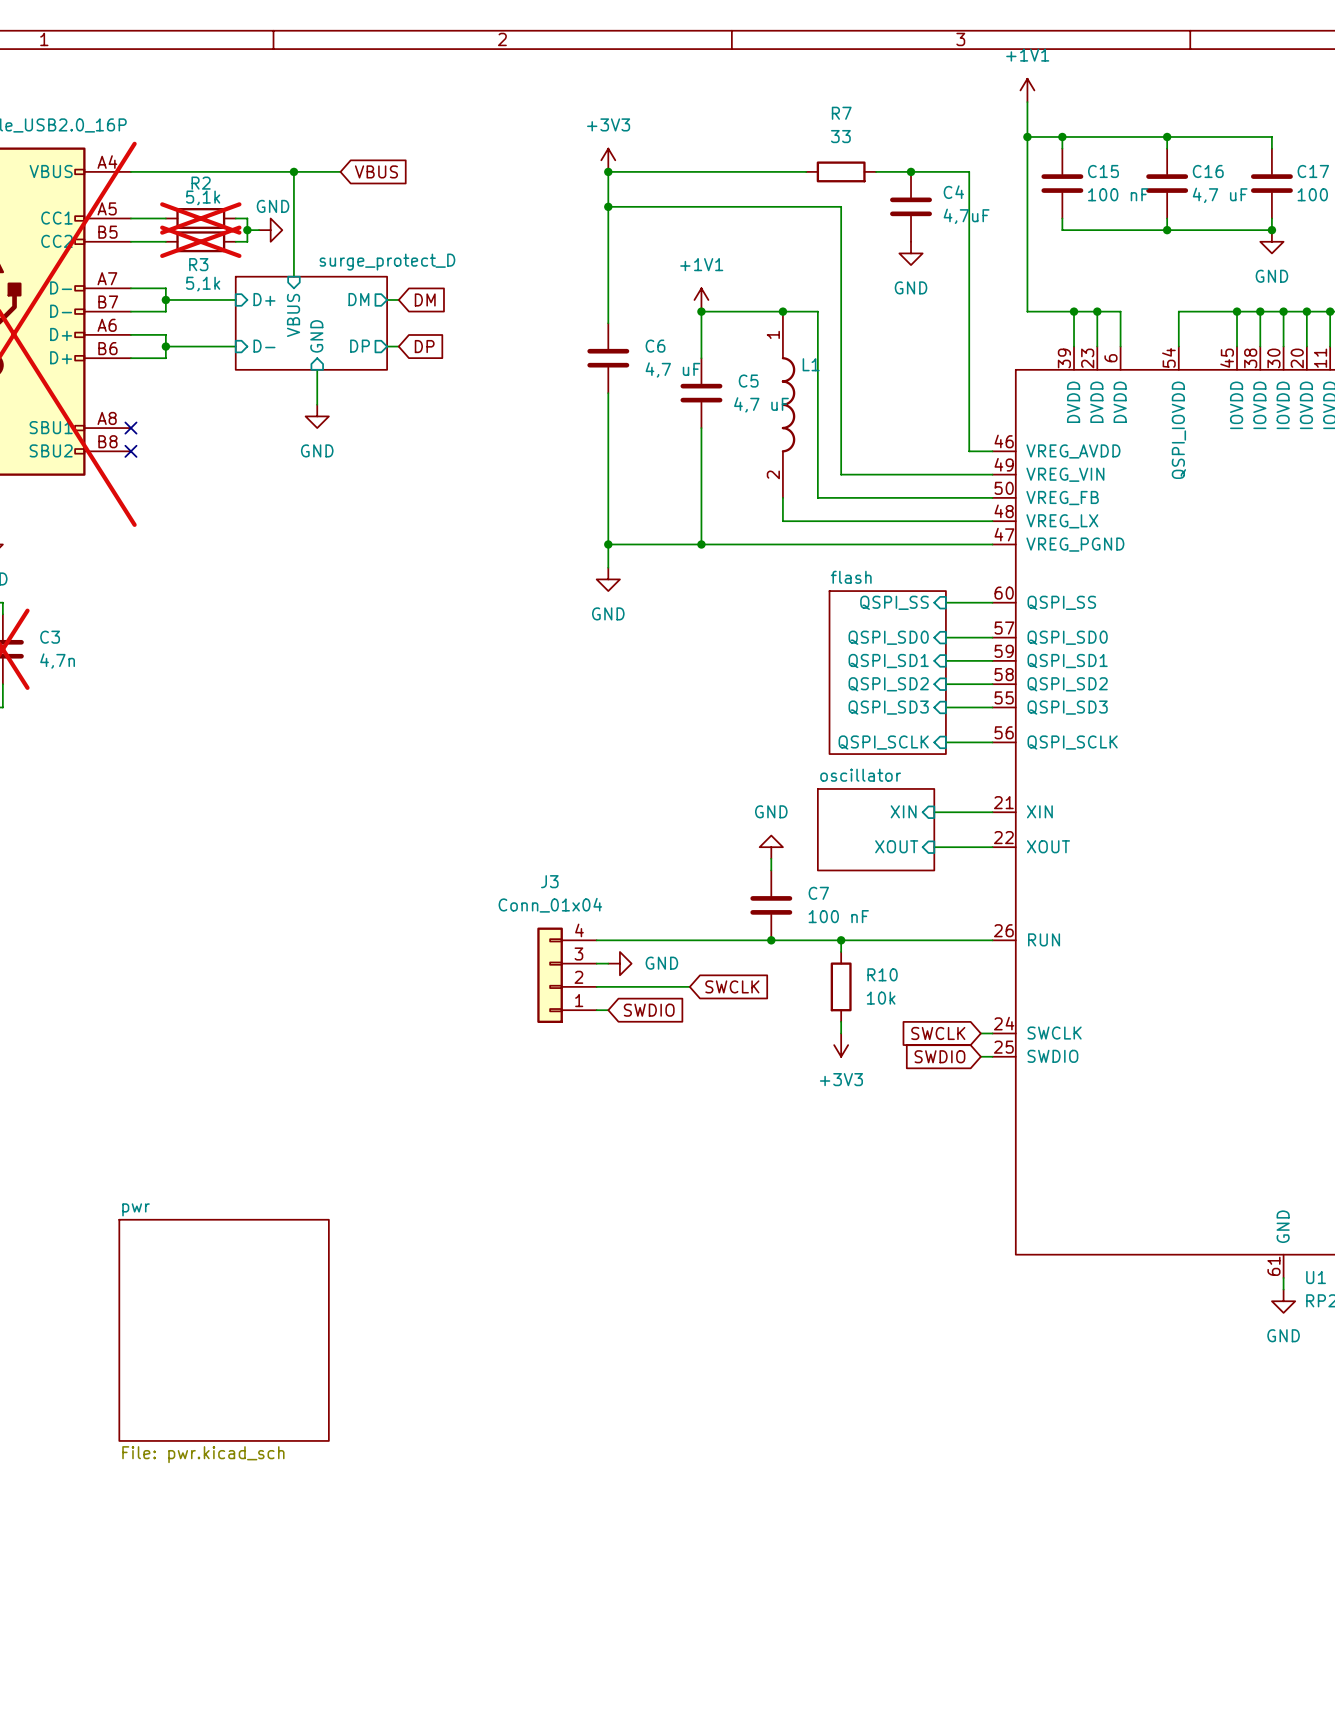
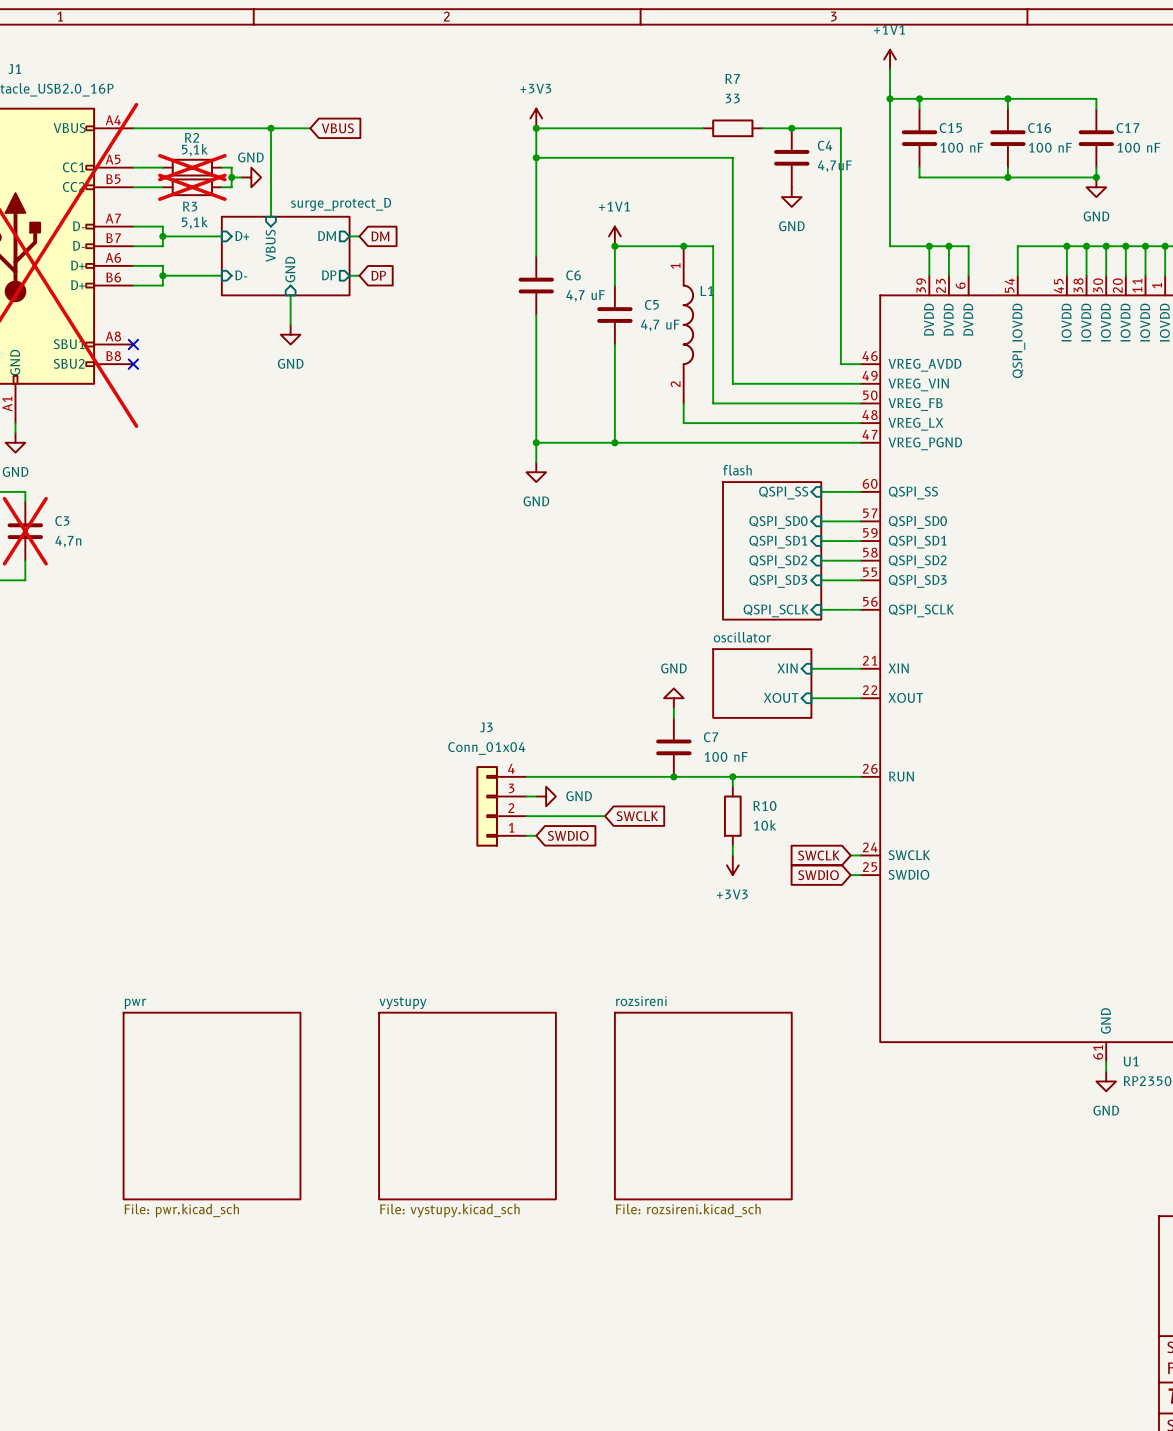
C16 value: 4,7 uF (1220, 195) -> 100 nF (1050, 147)
sheet vystupy: none -> File: vystupy.kicad_sch (467, 1106)
sheet rozsireni: none -> File: rozsireni.kicad_sch (703, 1106)

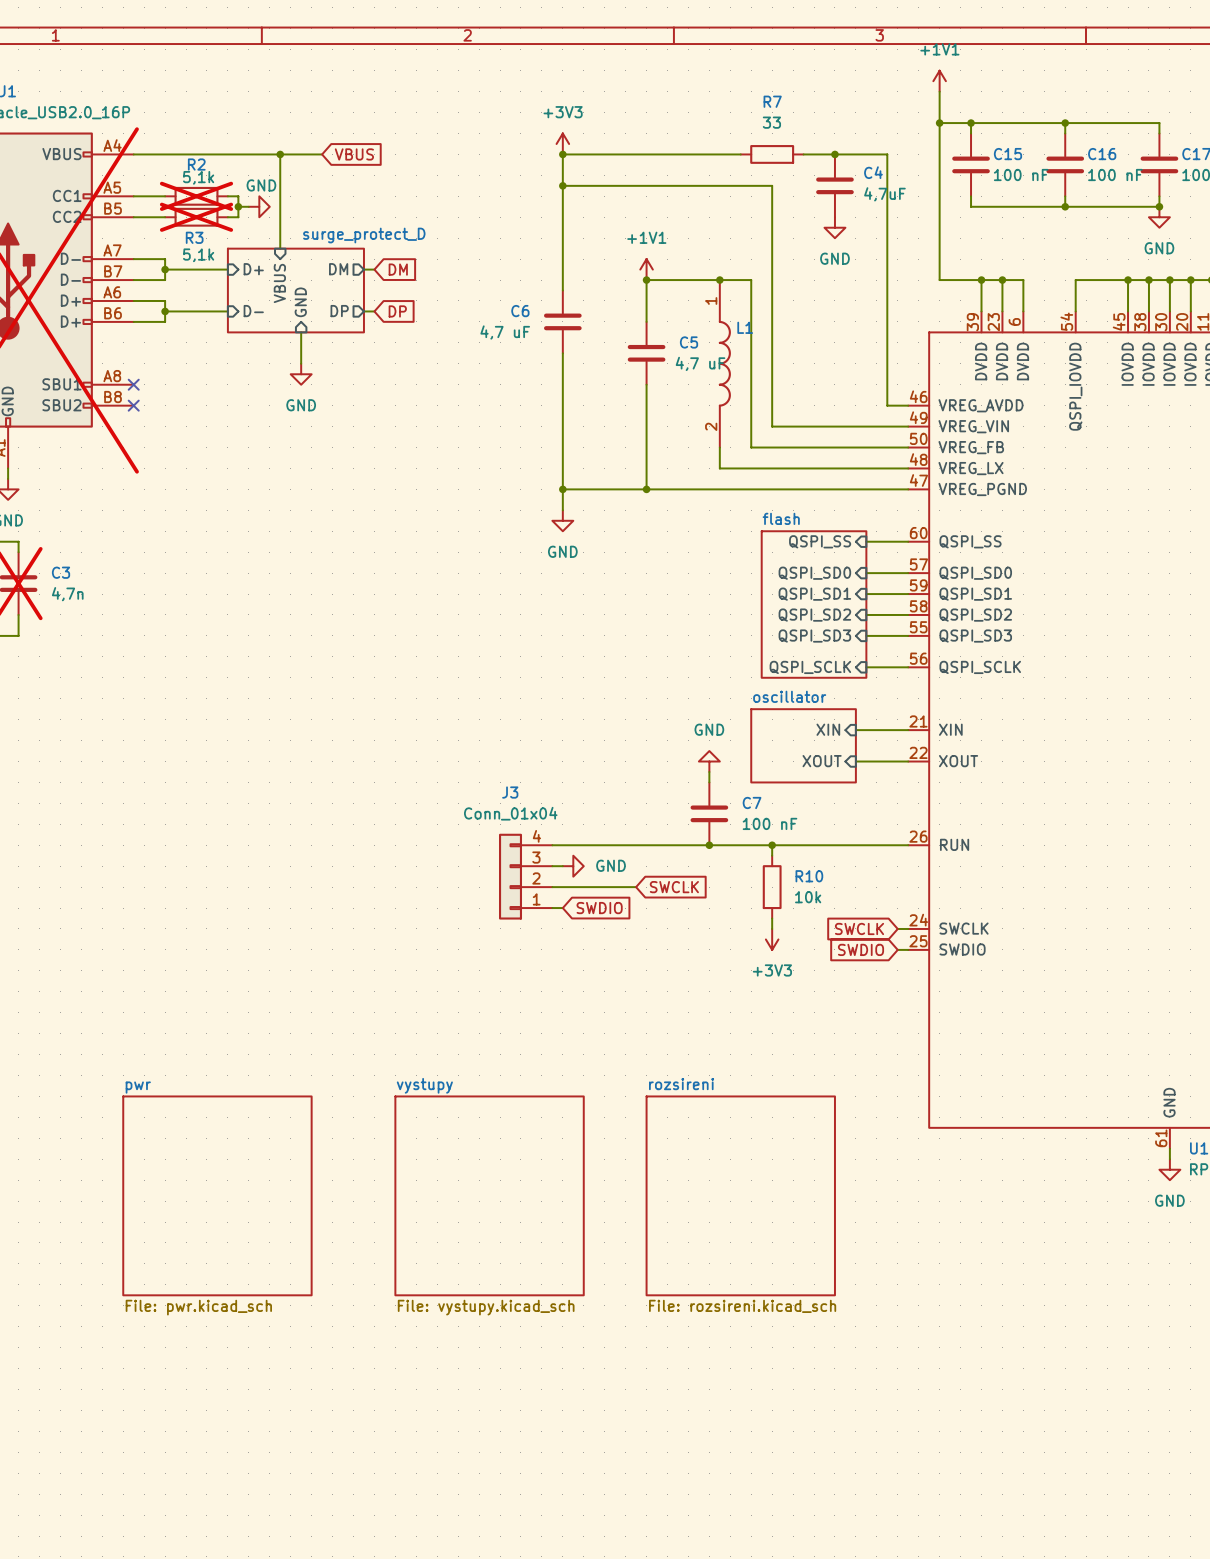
C6 name position: C6 (573, 275) -> C6 (520, 311)
C6 value position: 4,7 uF (585, 295) -> 4,7 uF (505, 332)

